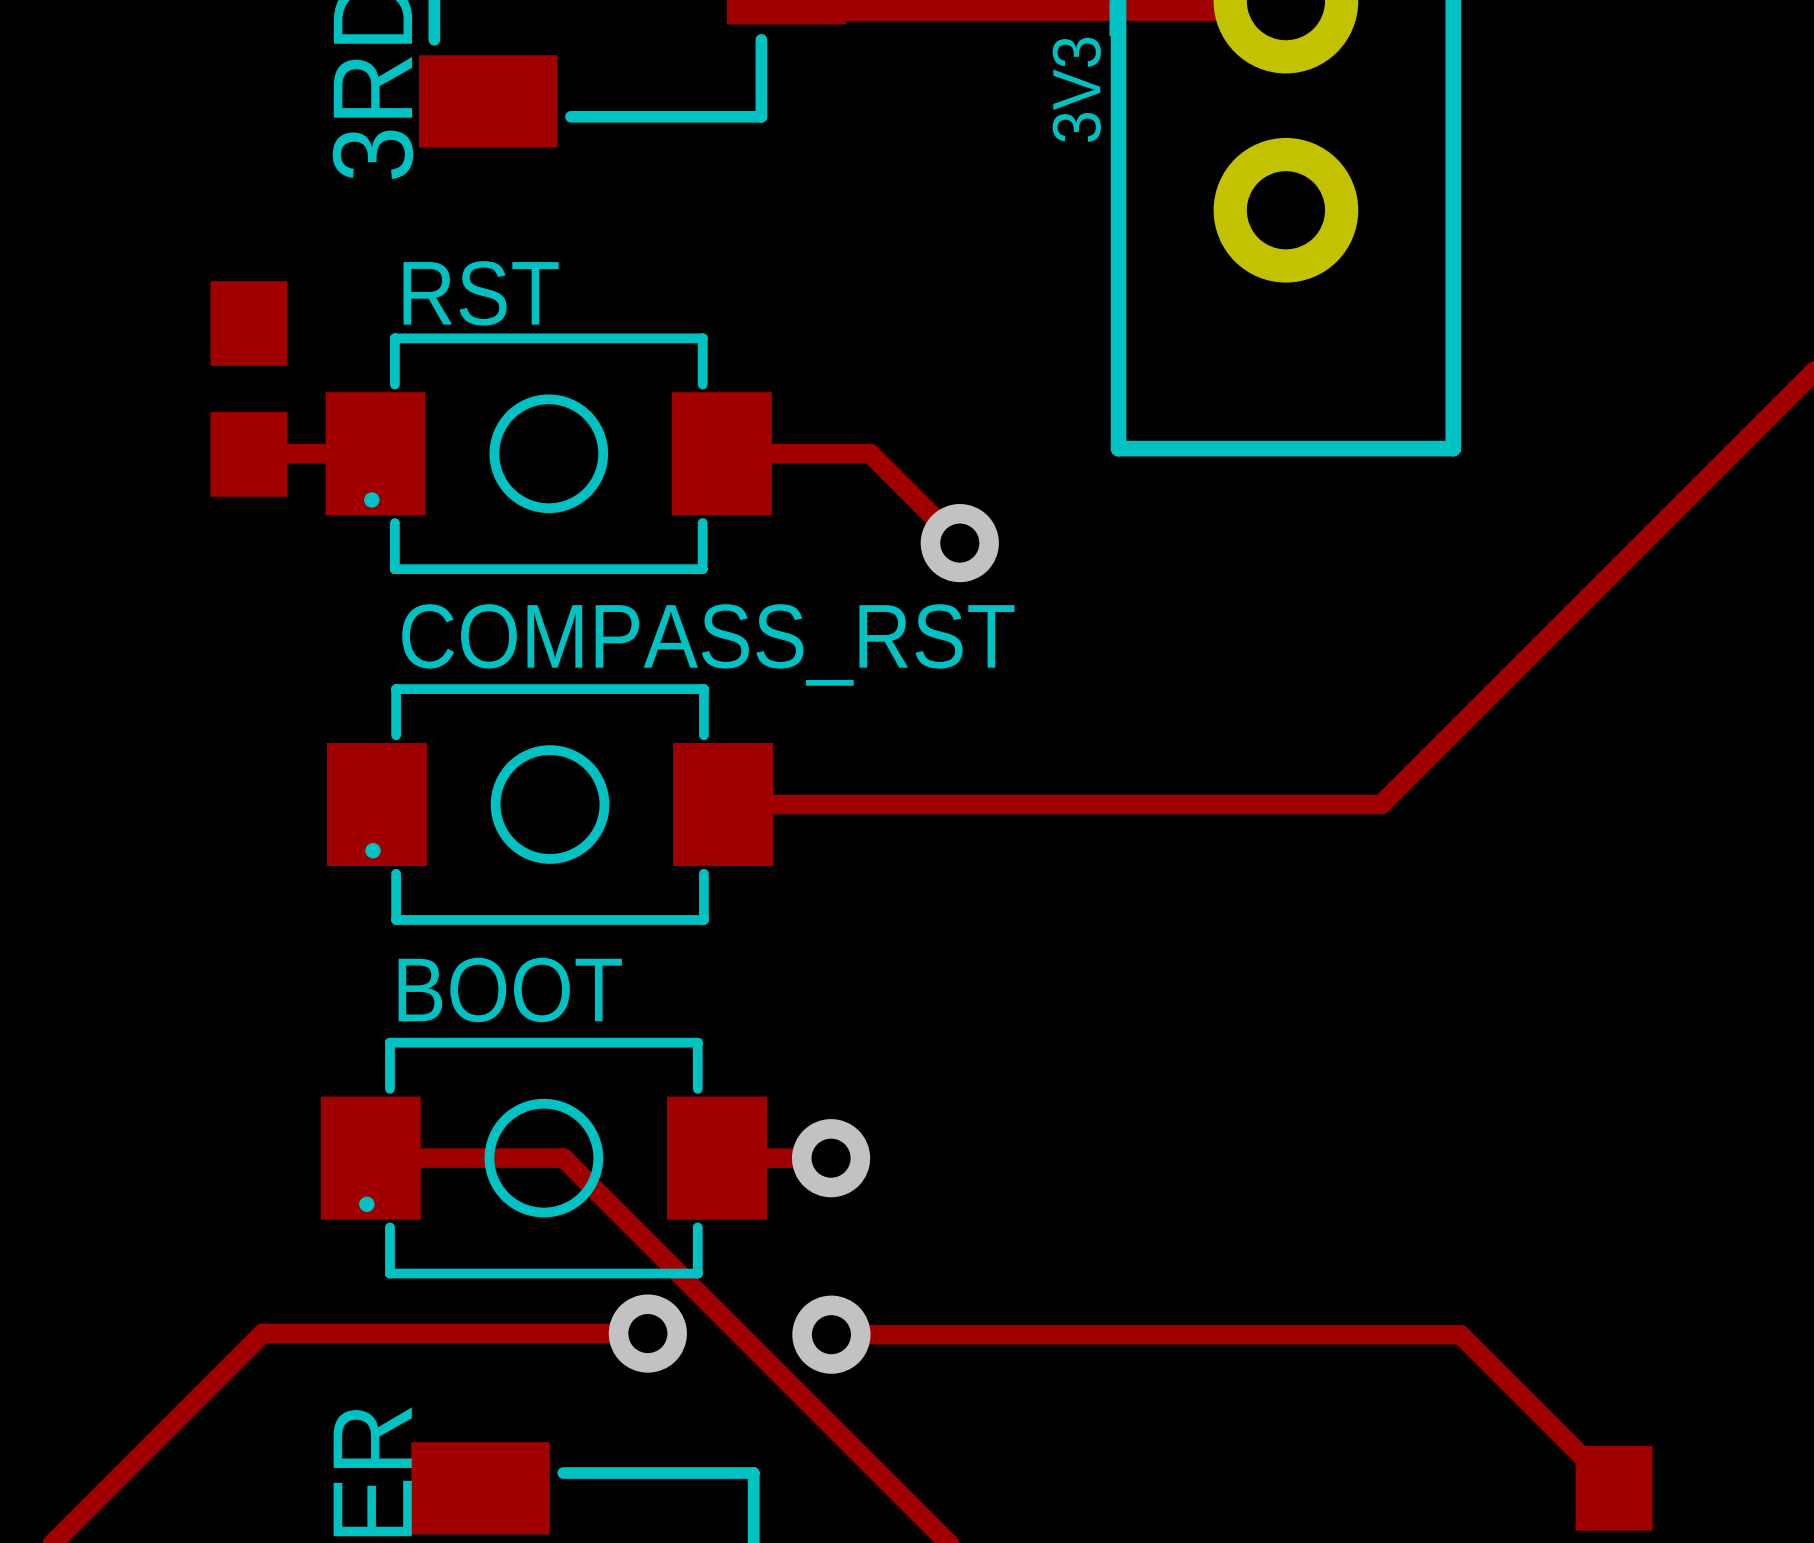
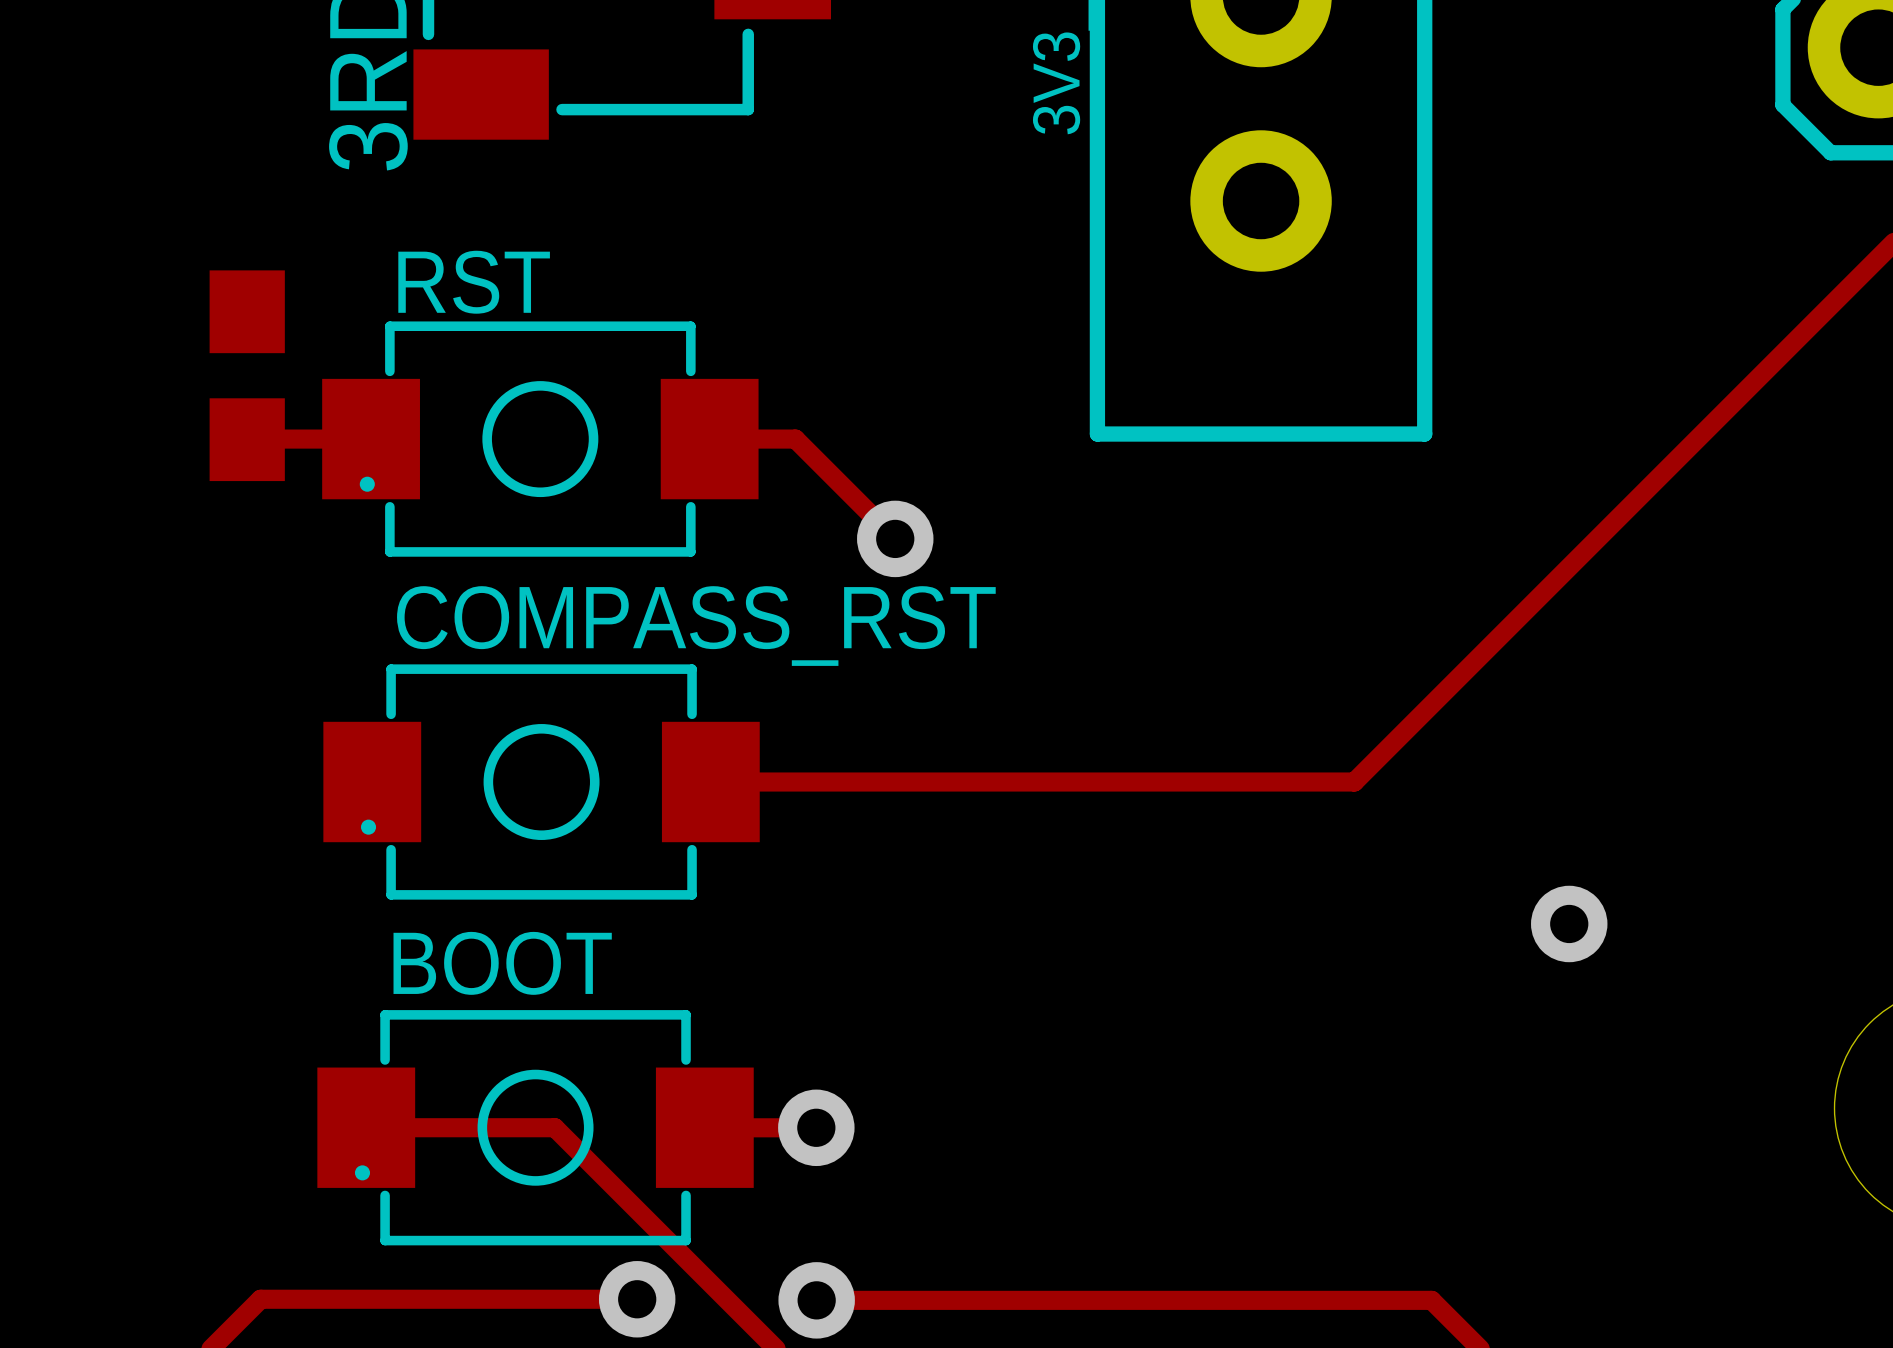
track: (809, 453) (870, 453) (959, 543) -> (795, 439) (895, 538)
via position: (959, 543) -> (895, 538)
via: none -> (1569, 923)

